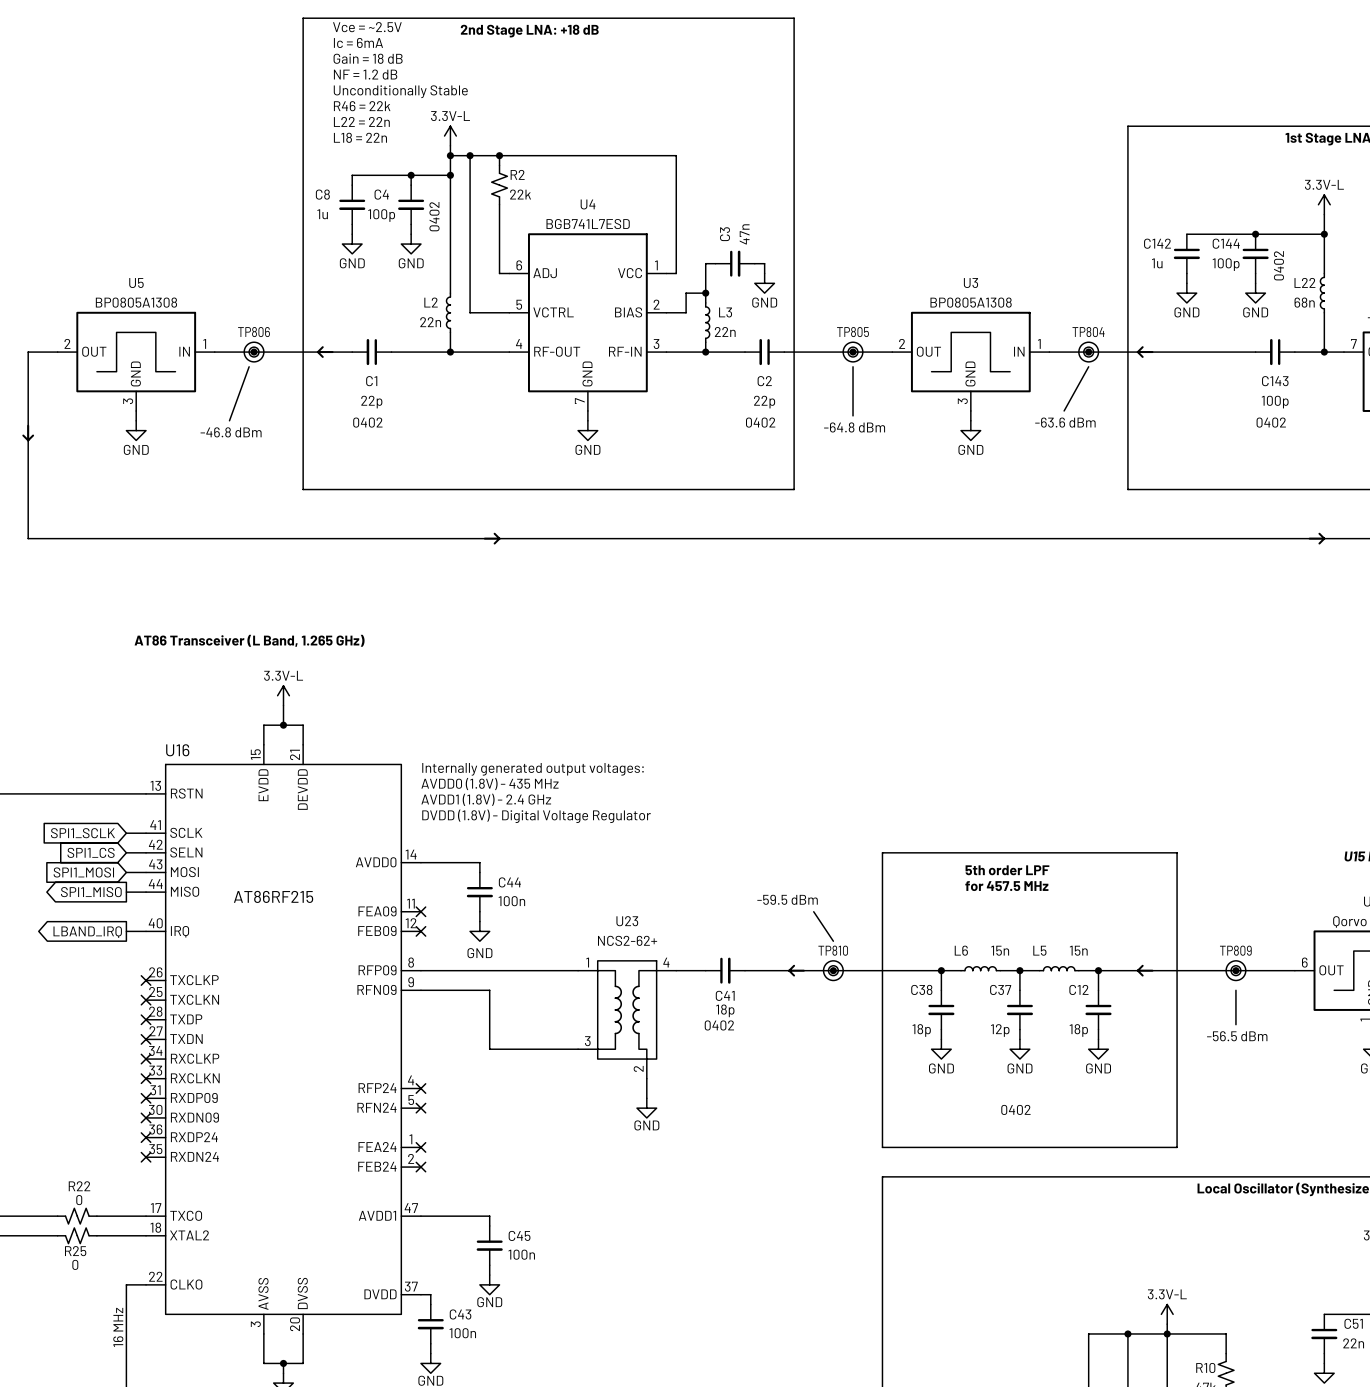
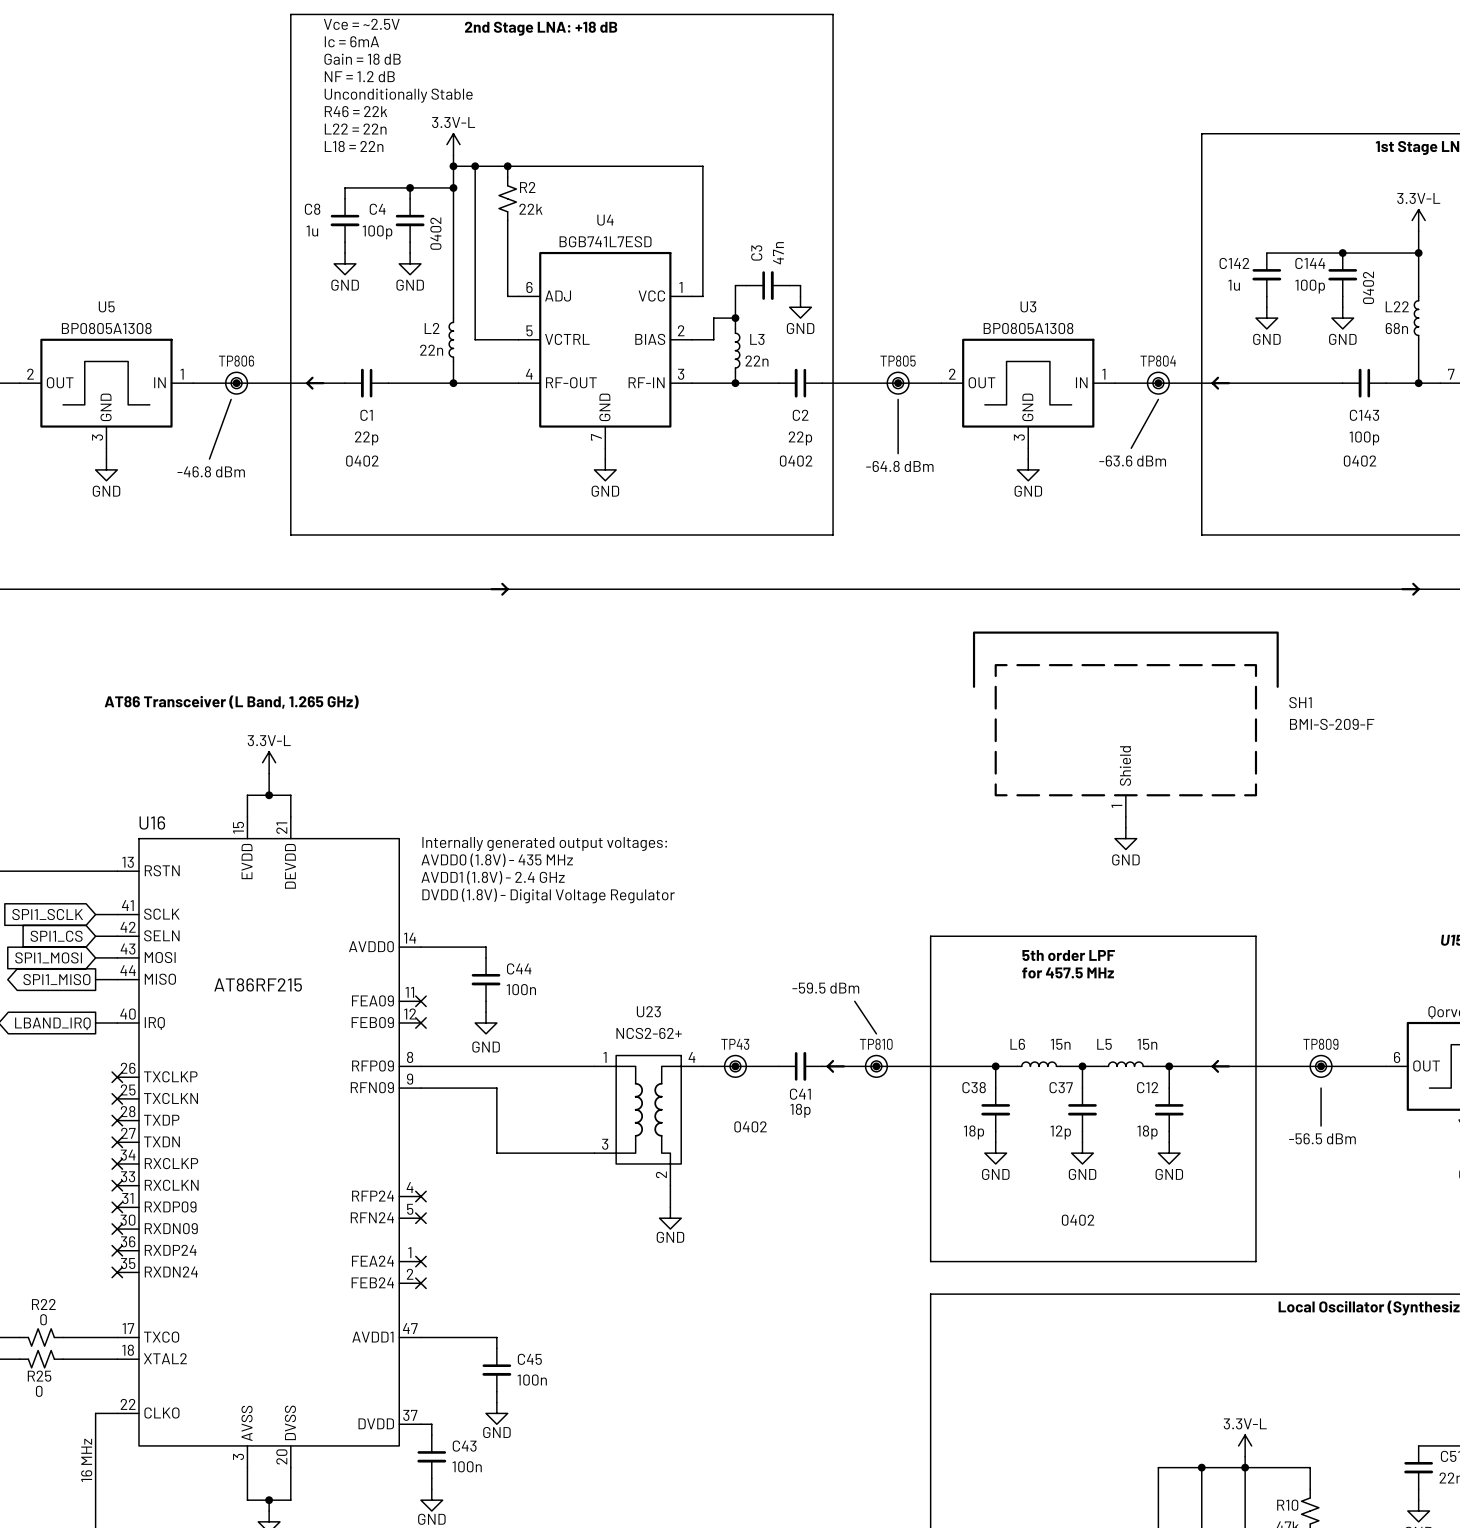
SH1: none -> BMI-S-209-F (1125, 724)
wire: none -> (1125, 816) (1125, 827)
power symbol: none -> GND (1125, 838)
TP43: none -> (735, 1066)
junction: none -> (735, 1066)
C41 position: (725, 970) -> (800, 1066)

